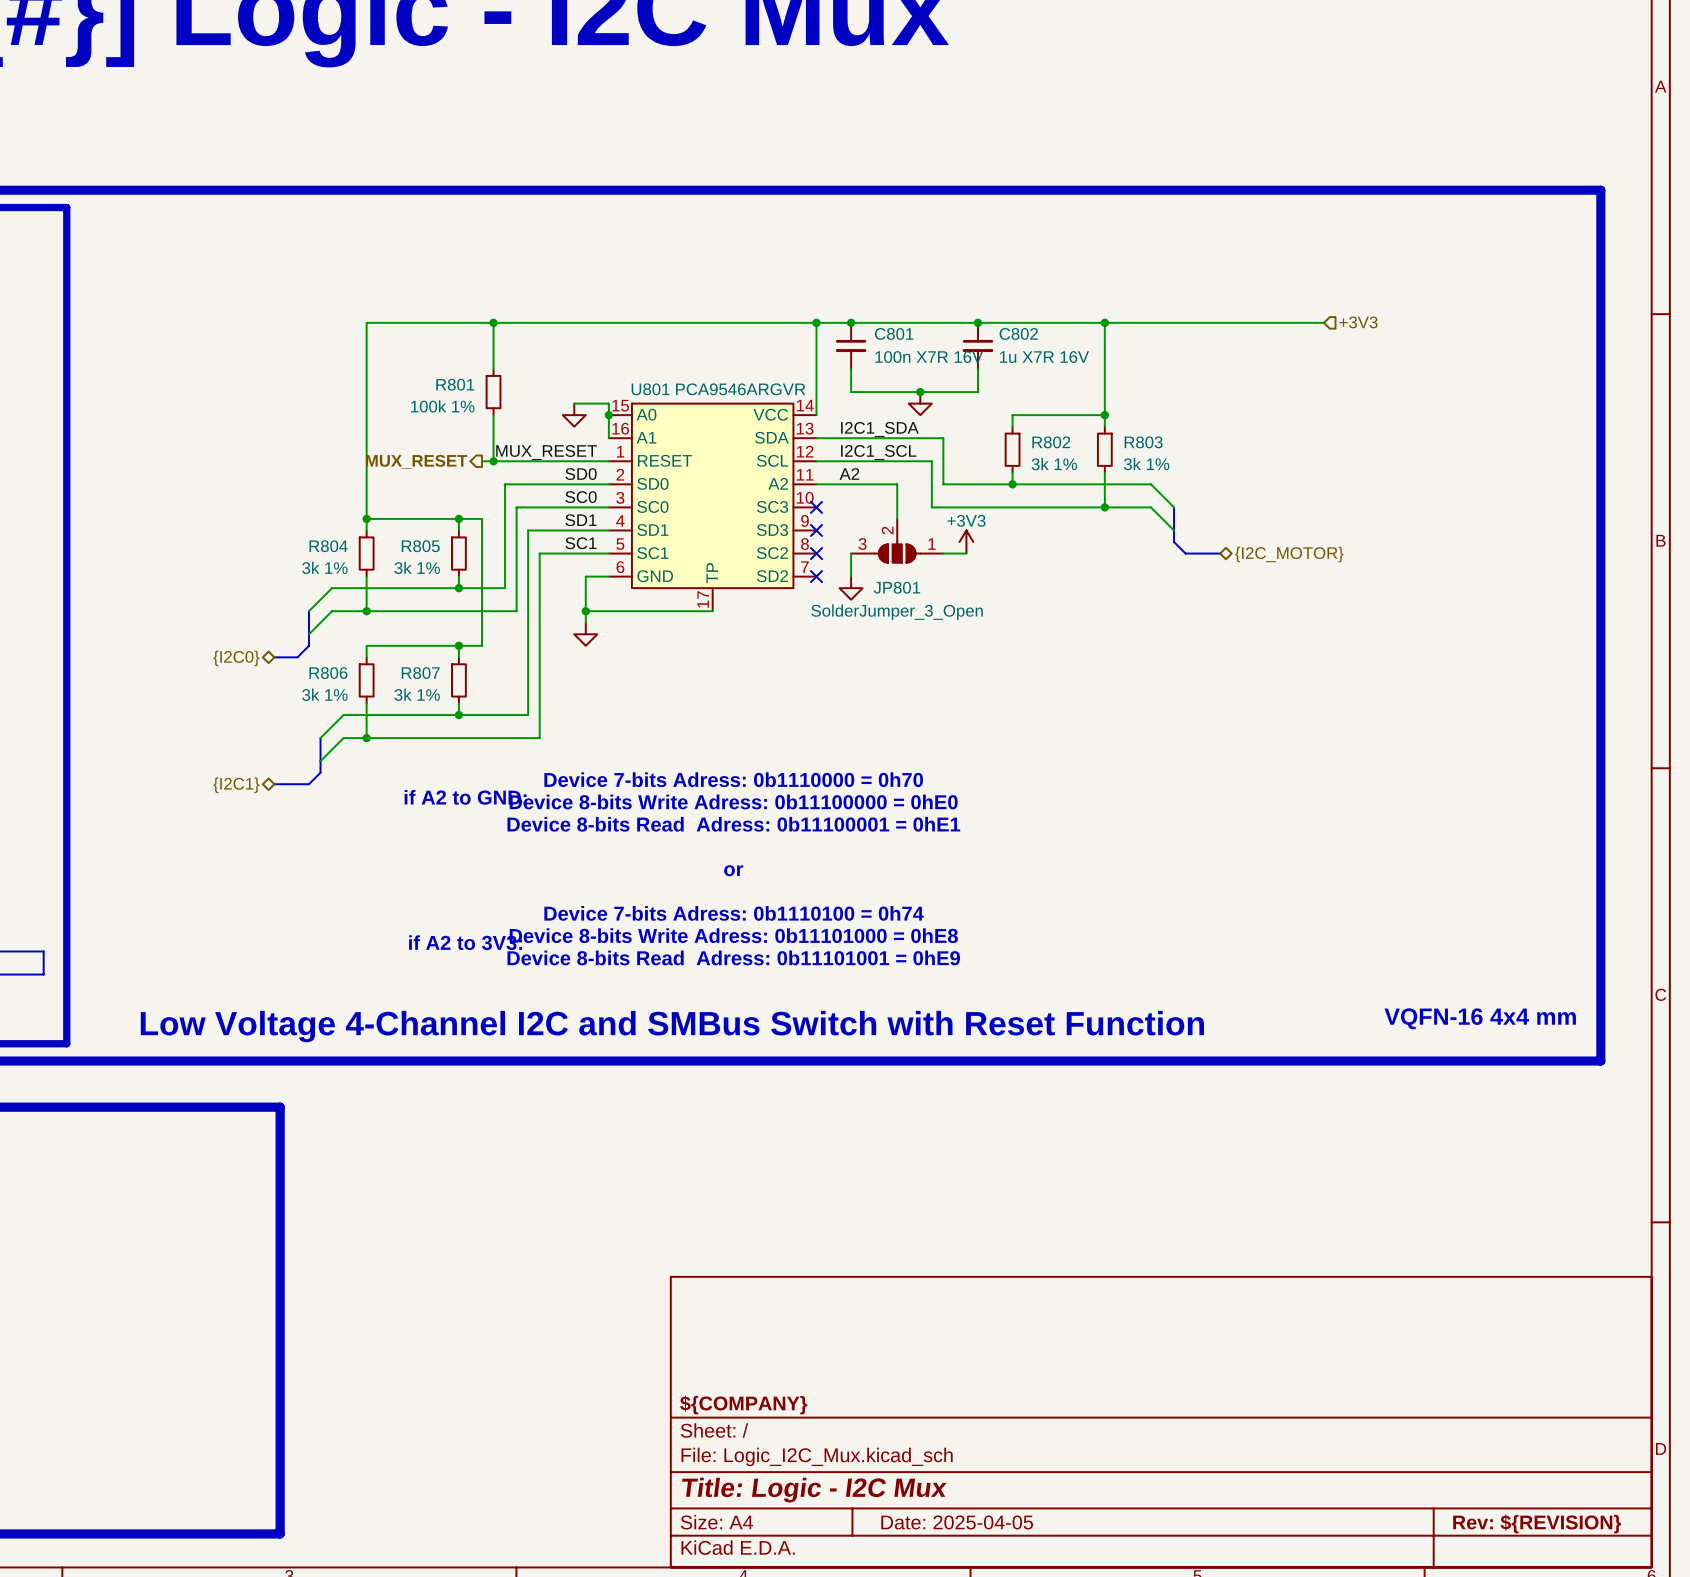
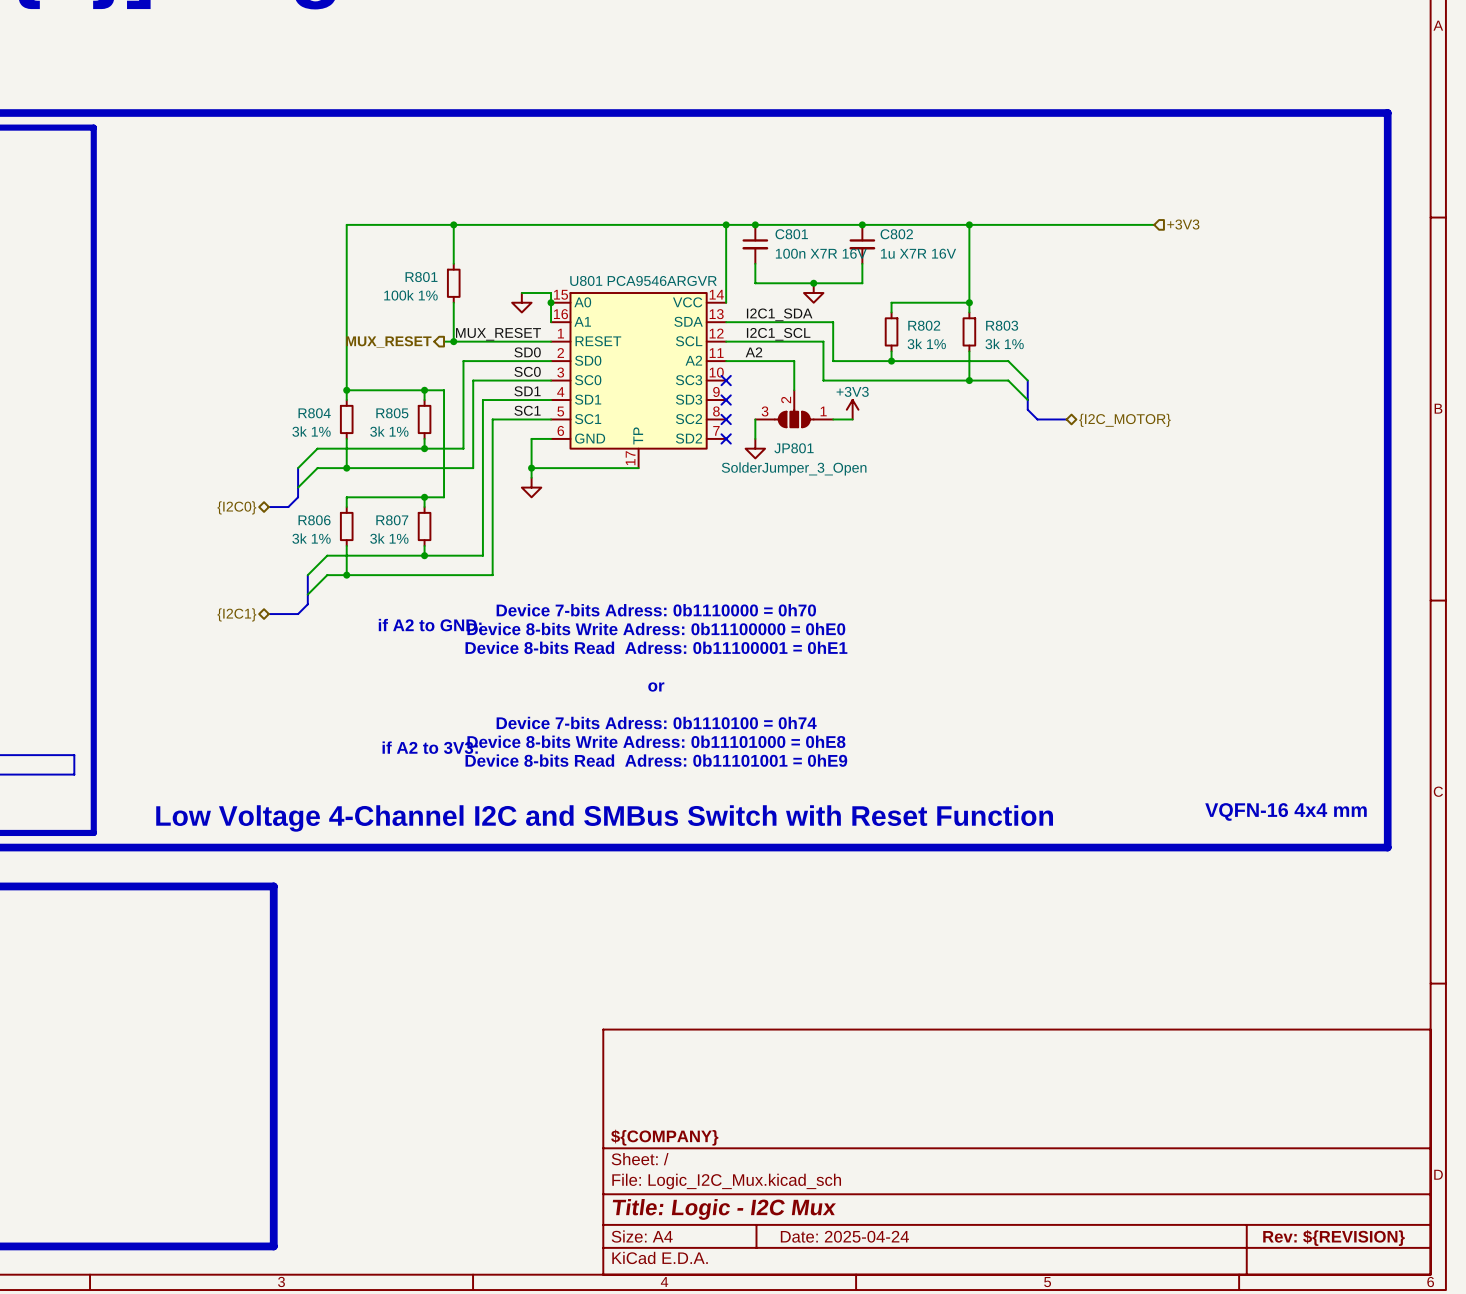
title block: Date: 2025-04-05 (957, 1522) -> Date: 2025-04-24 (844, 1236)

